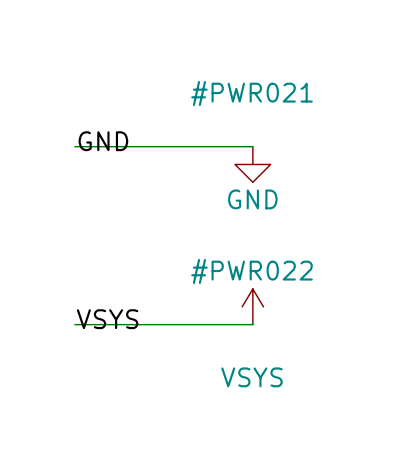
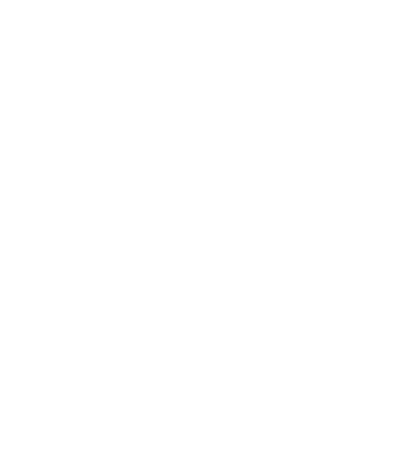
label: GND (103, 141) -> none
wire: (74, 146) (252, 146) -> none
#PWR021: GND (252, 164) -> none
#PWR022: VSYS (252, 306) -> none
label: VSYS (107, 319) -> none
wire: (74, 324) (252, 324) -> none

